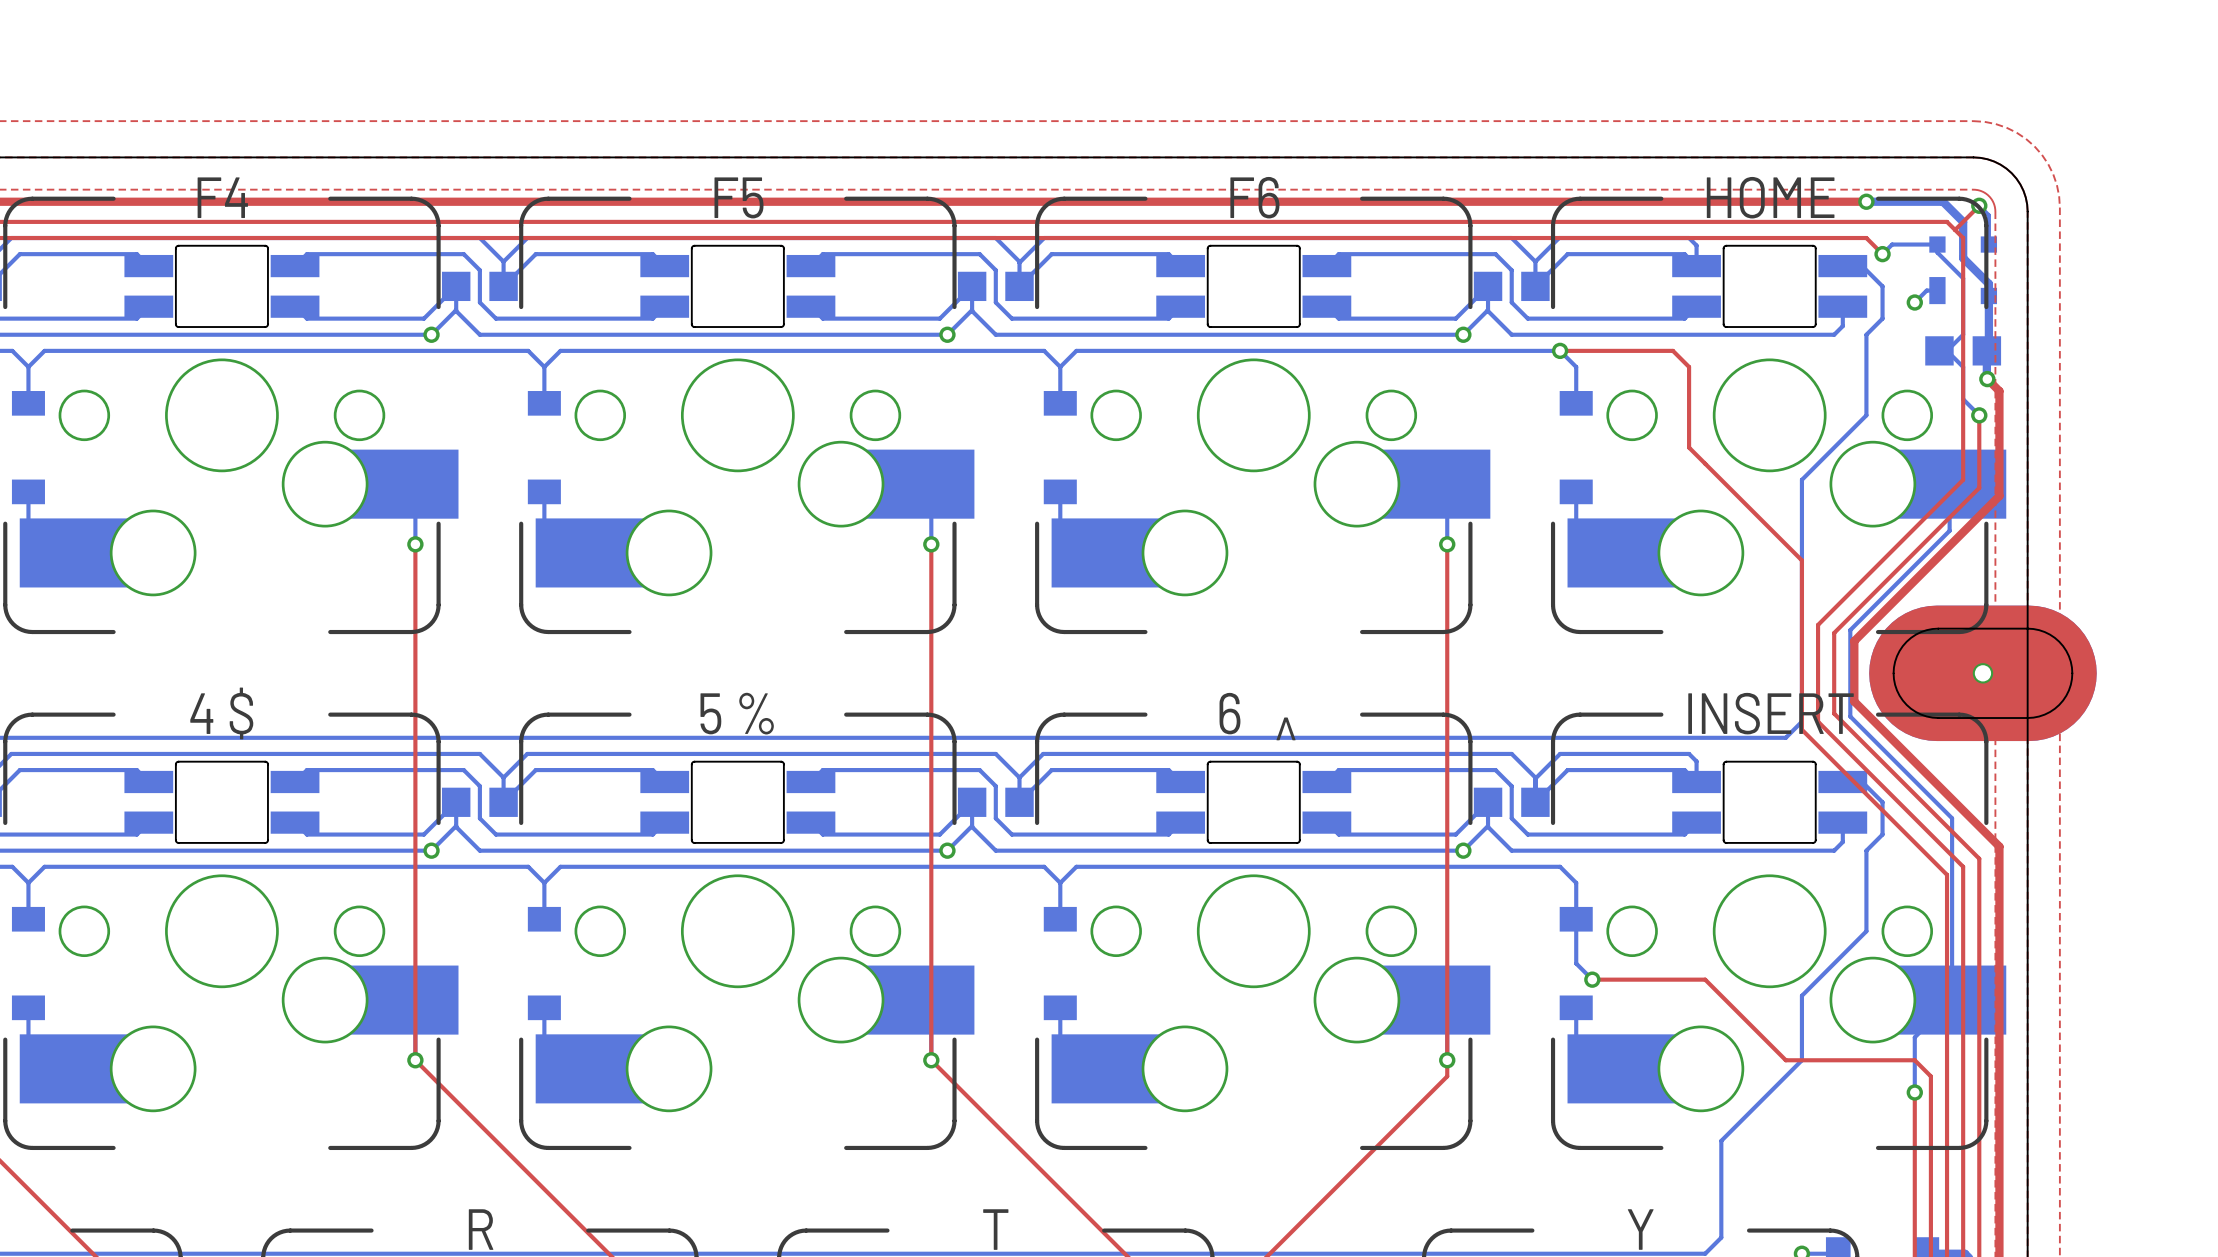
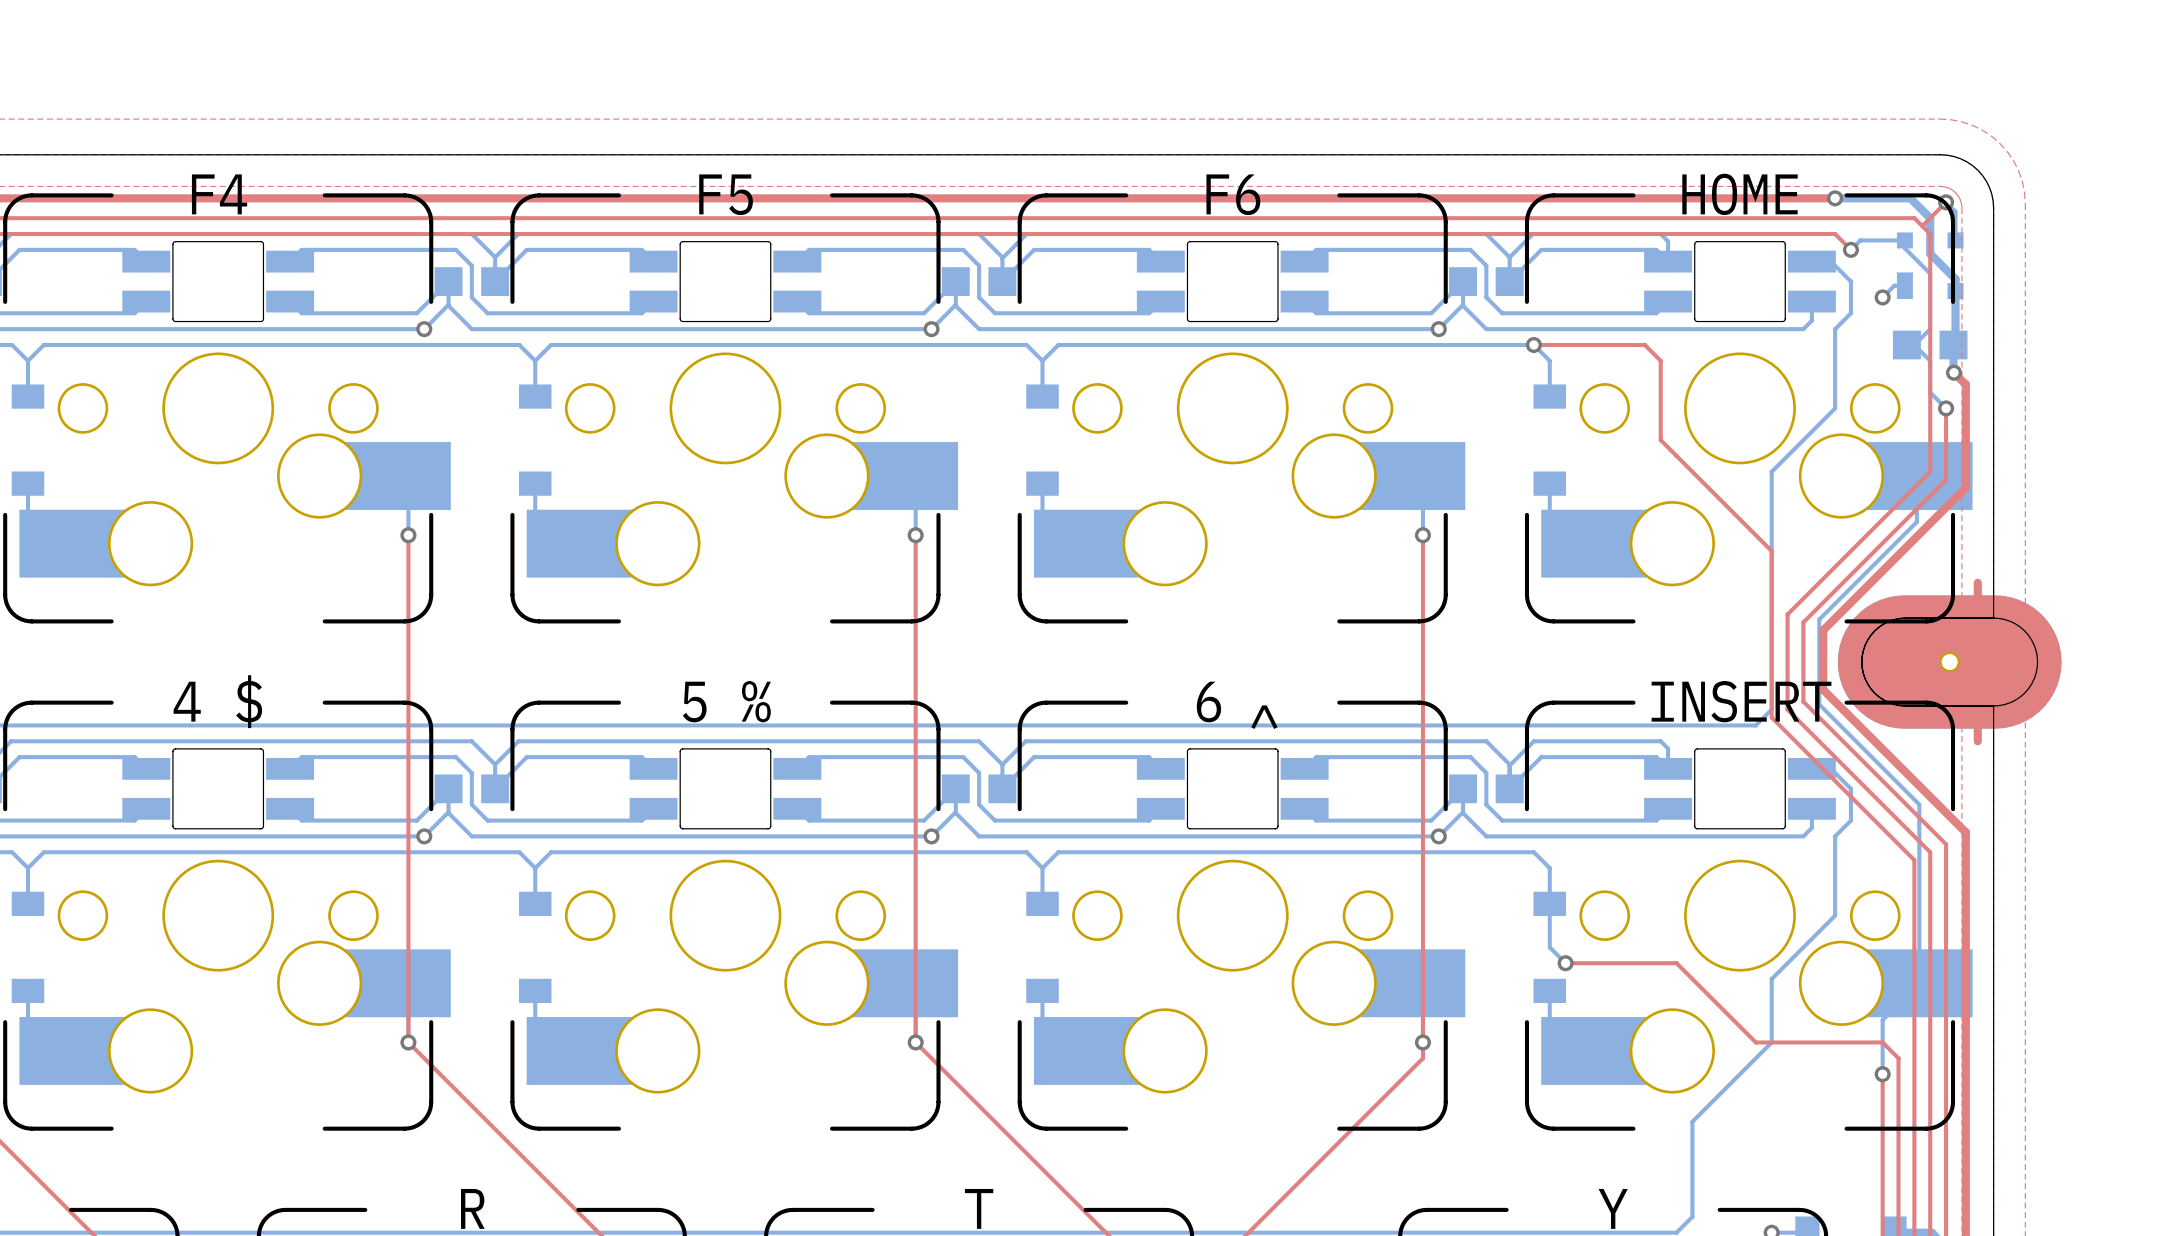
top track: none -> (1977, 582) (1977, 633)
board edge: (2027, 628) (2027, 718) -> (1993, 618) (1894, 619) (1879, 627) (1870, 635) (1863, 650) (1861, 662) (1863, 673) (1870, 688) (1879, 696) (1894, 704) (1993, 705)
top track: none -> (1977, 690) (1977, 741)

